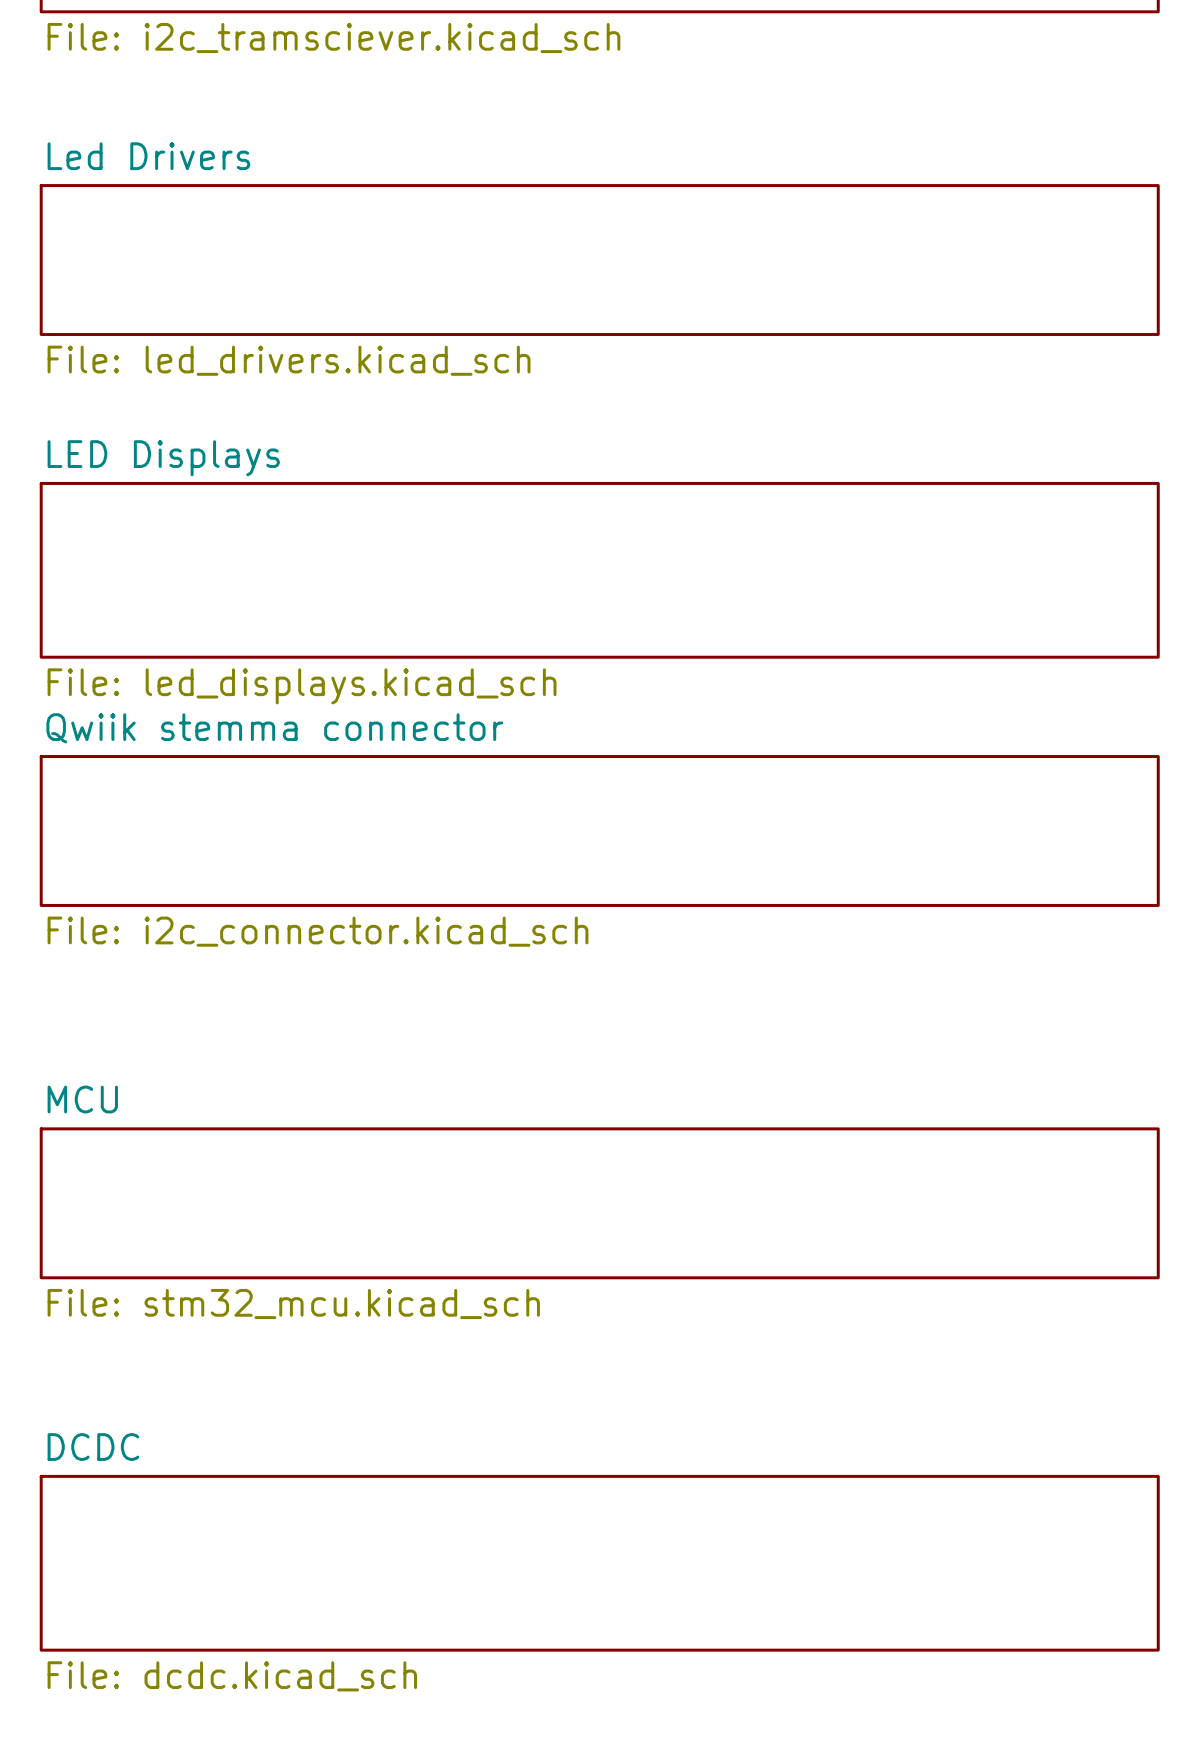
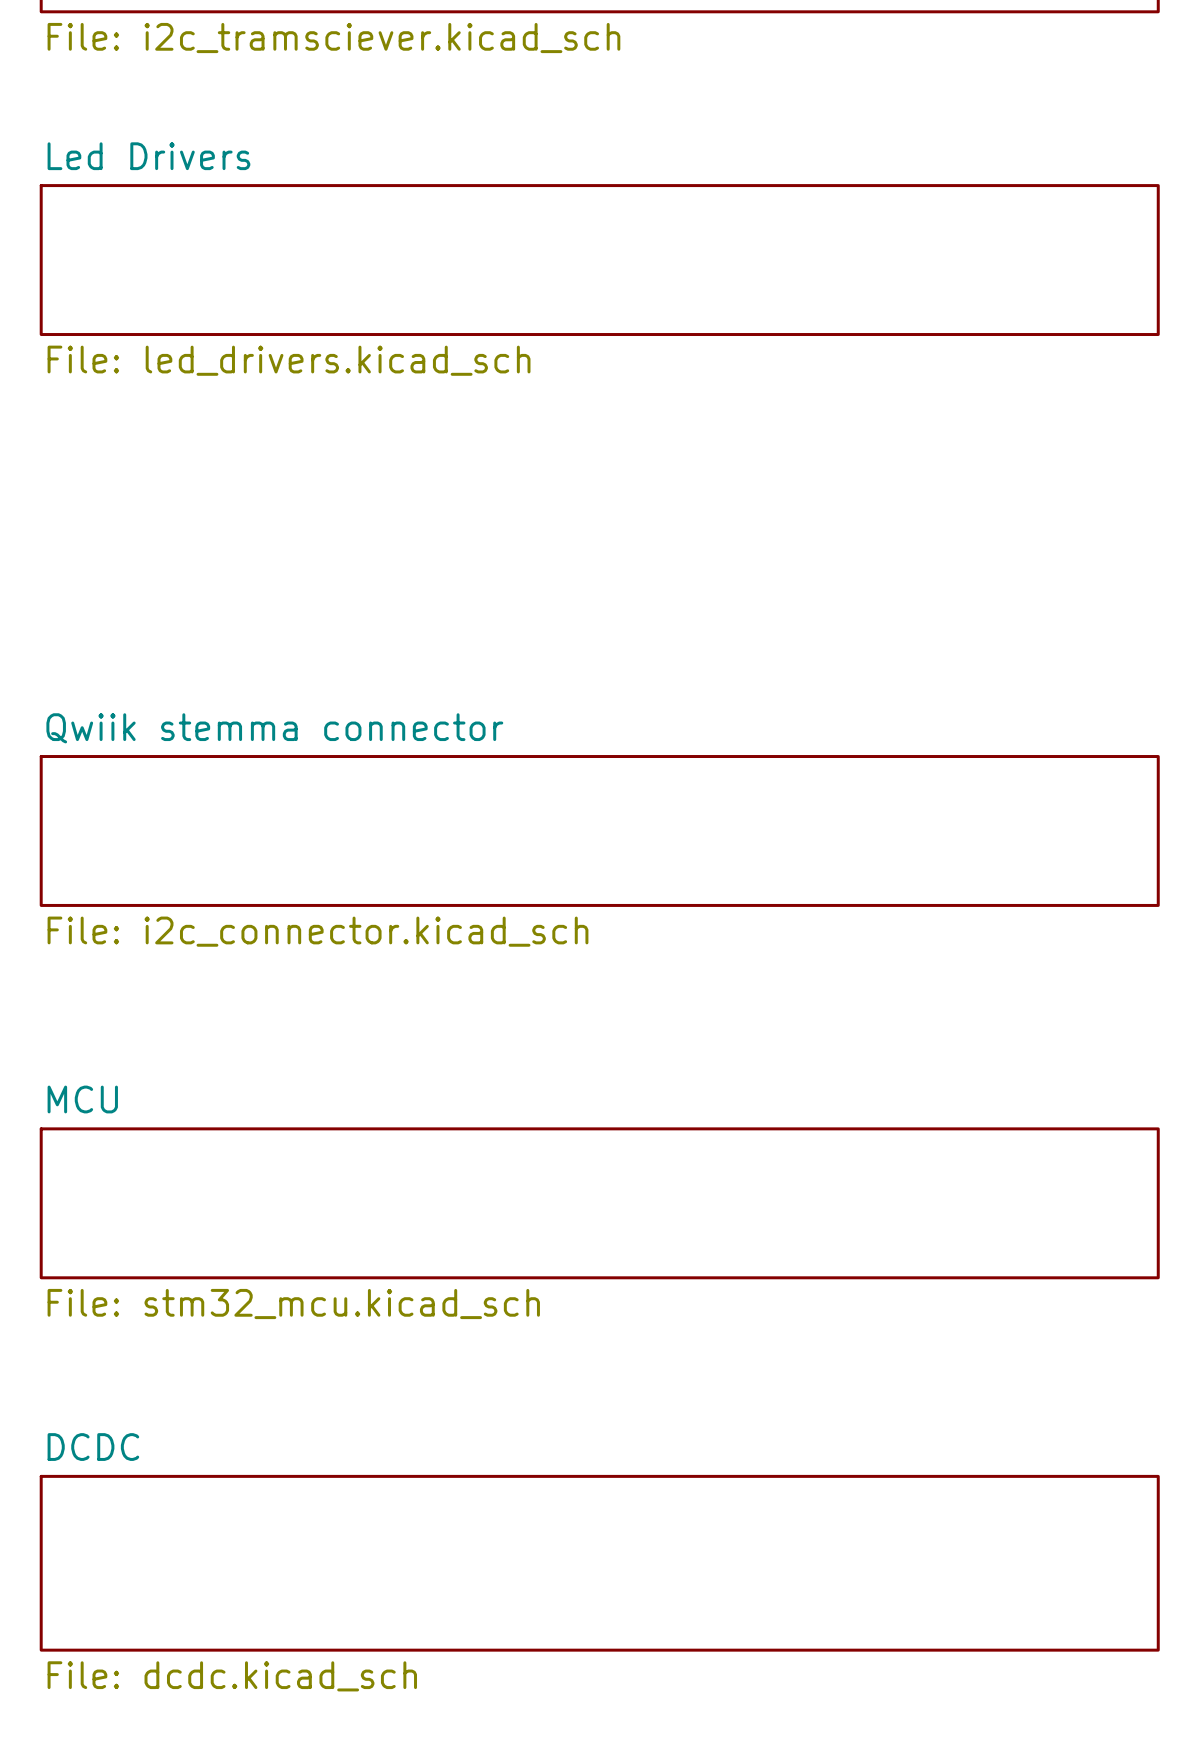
sheet LED Displays: File: led_displays.kicad_sch (599, 570) -> none

